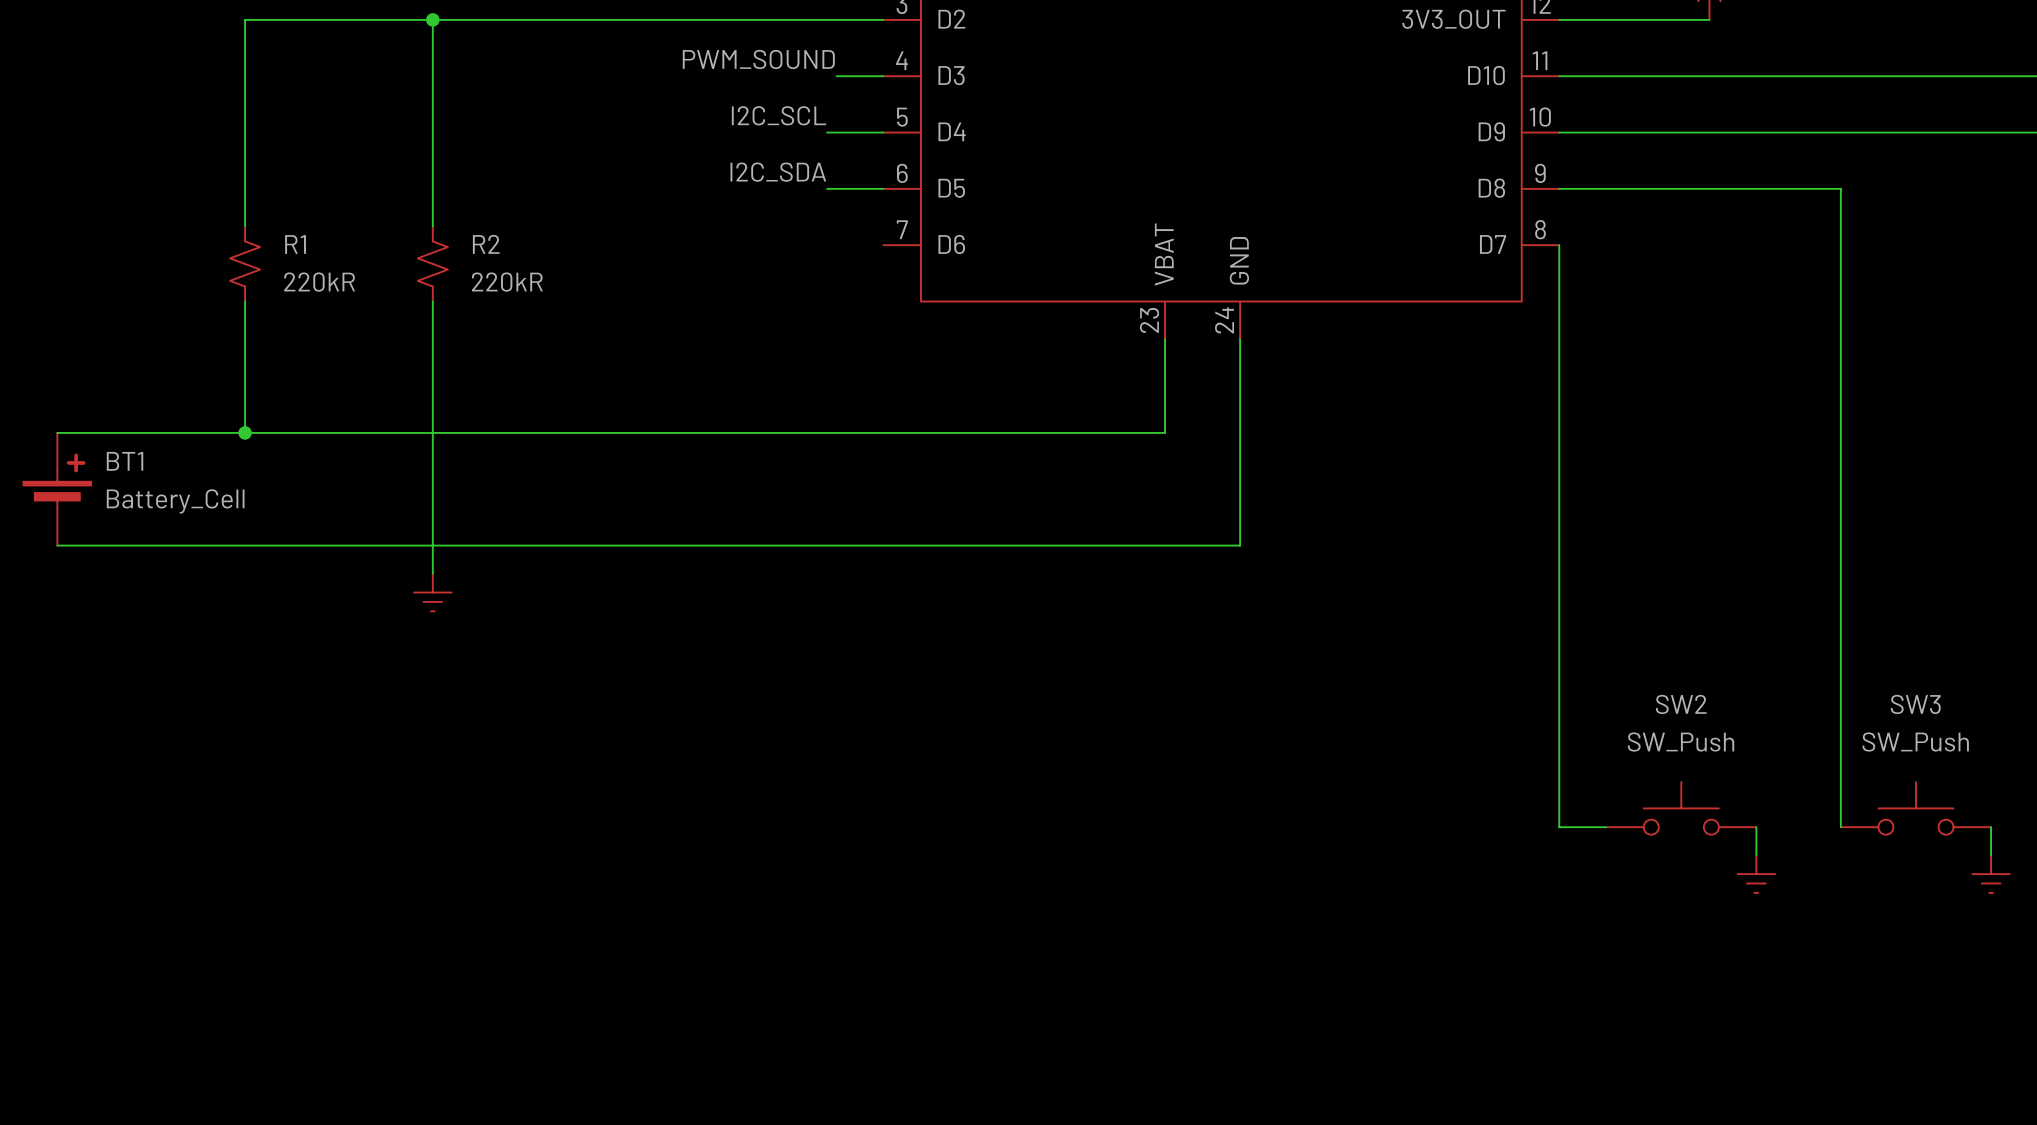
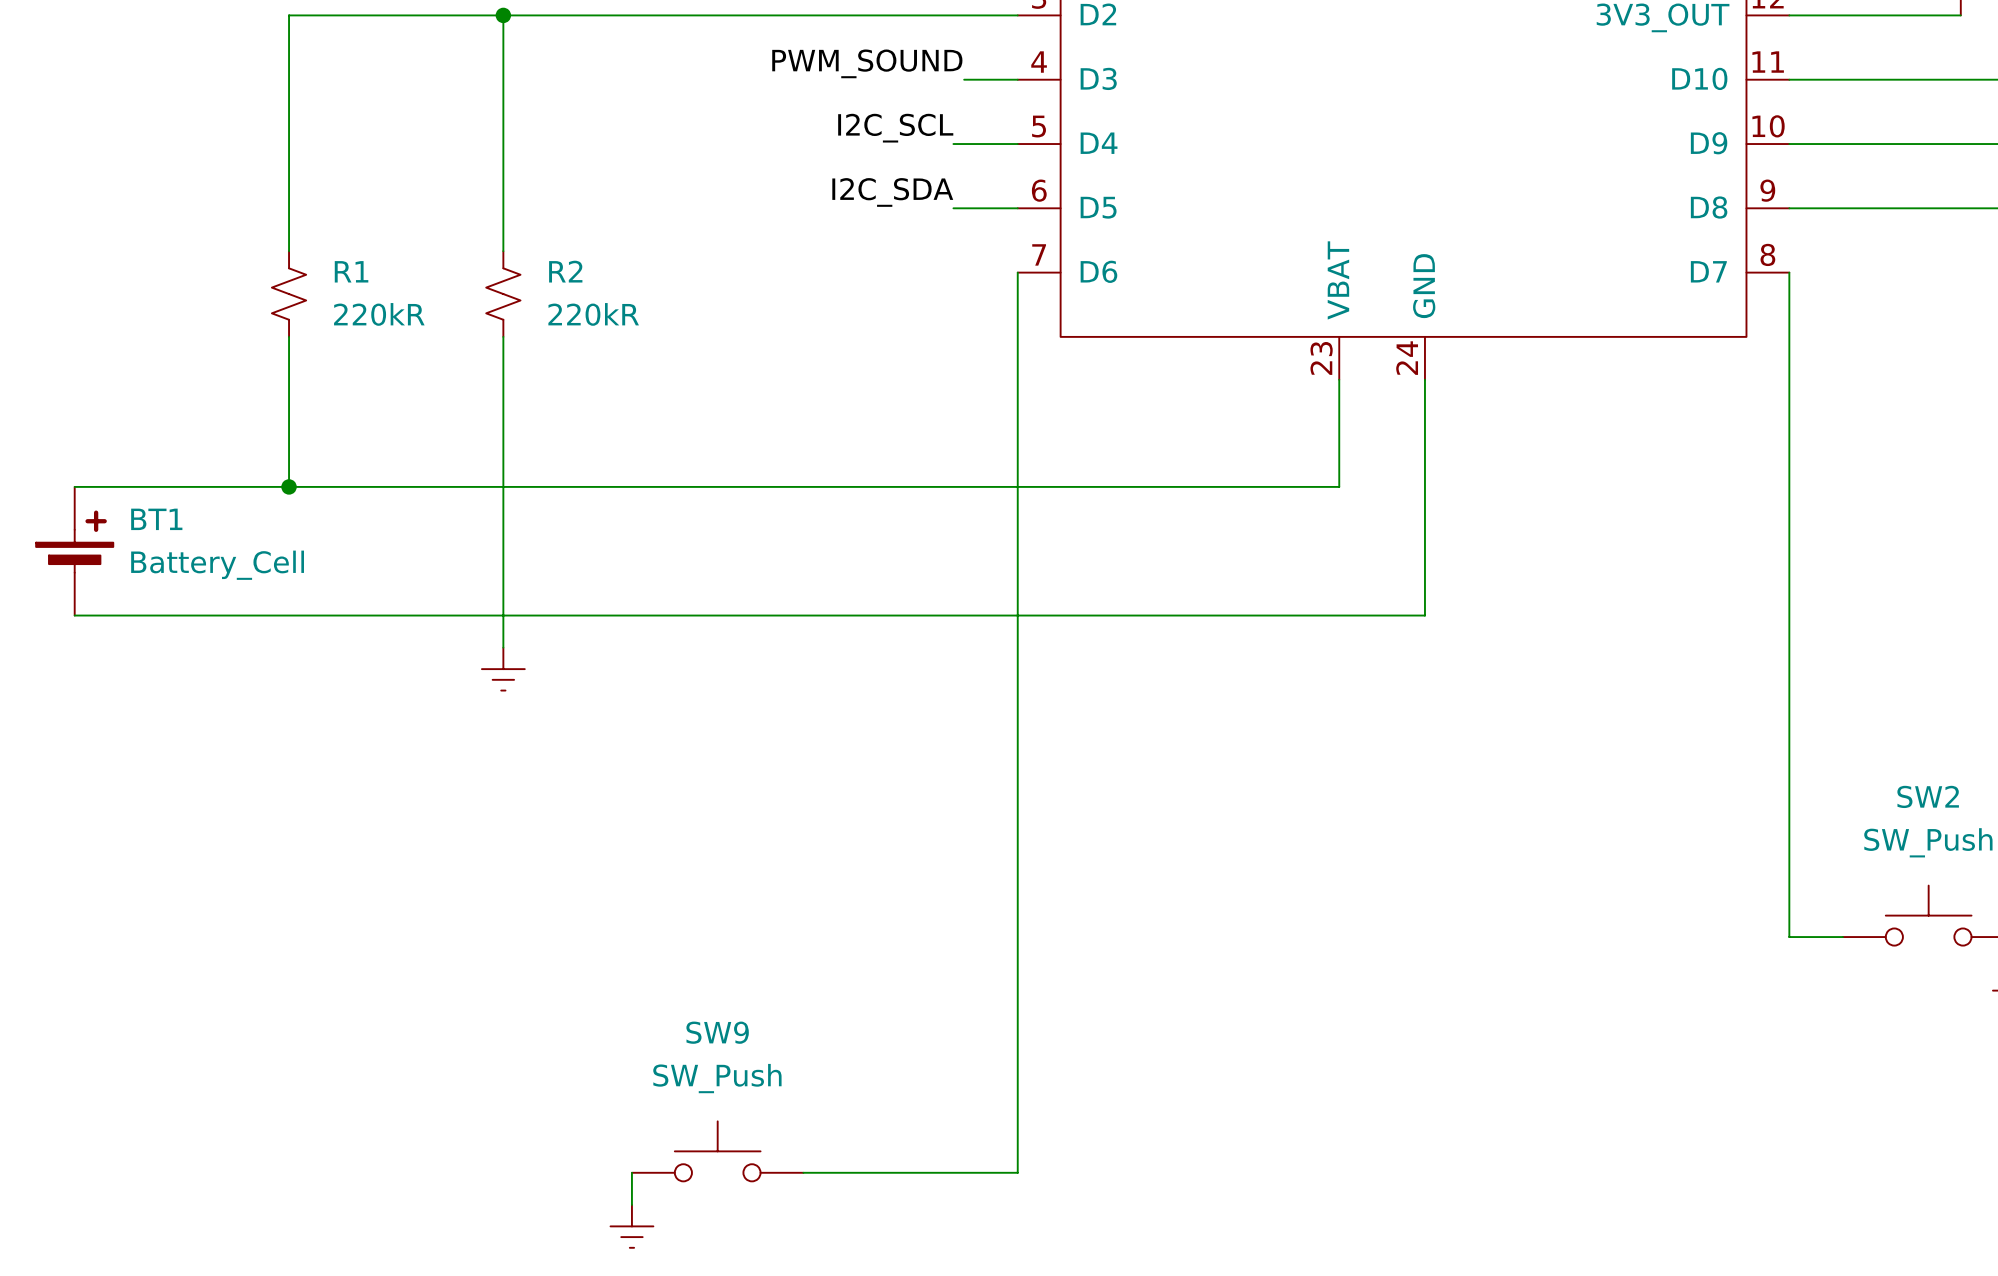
wire: none -> (1017, 272) (1017, 1172) (803, 1172)
SW9: none -> SW_Push (717, 1151)
wire: none -> (631, 1172) (631, 1204)
power symbol: none -> (631, 1226)

